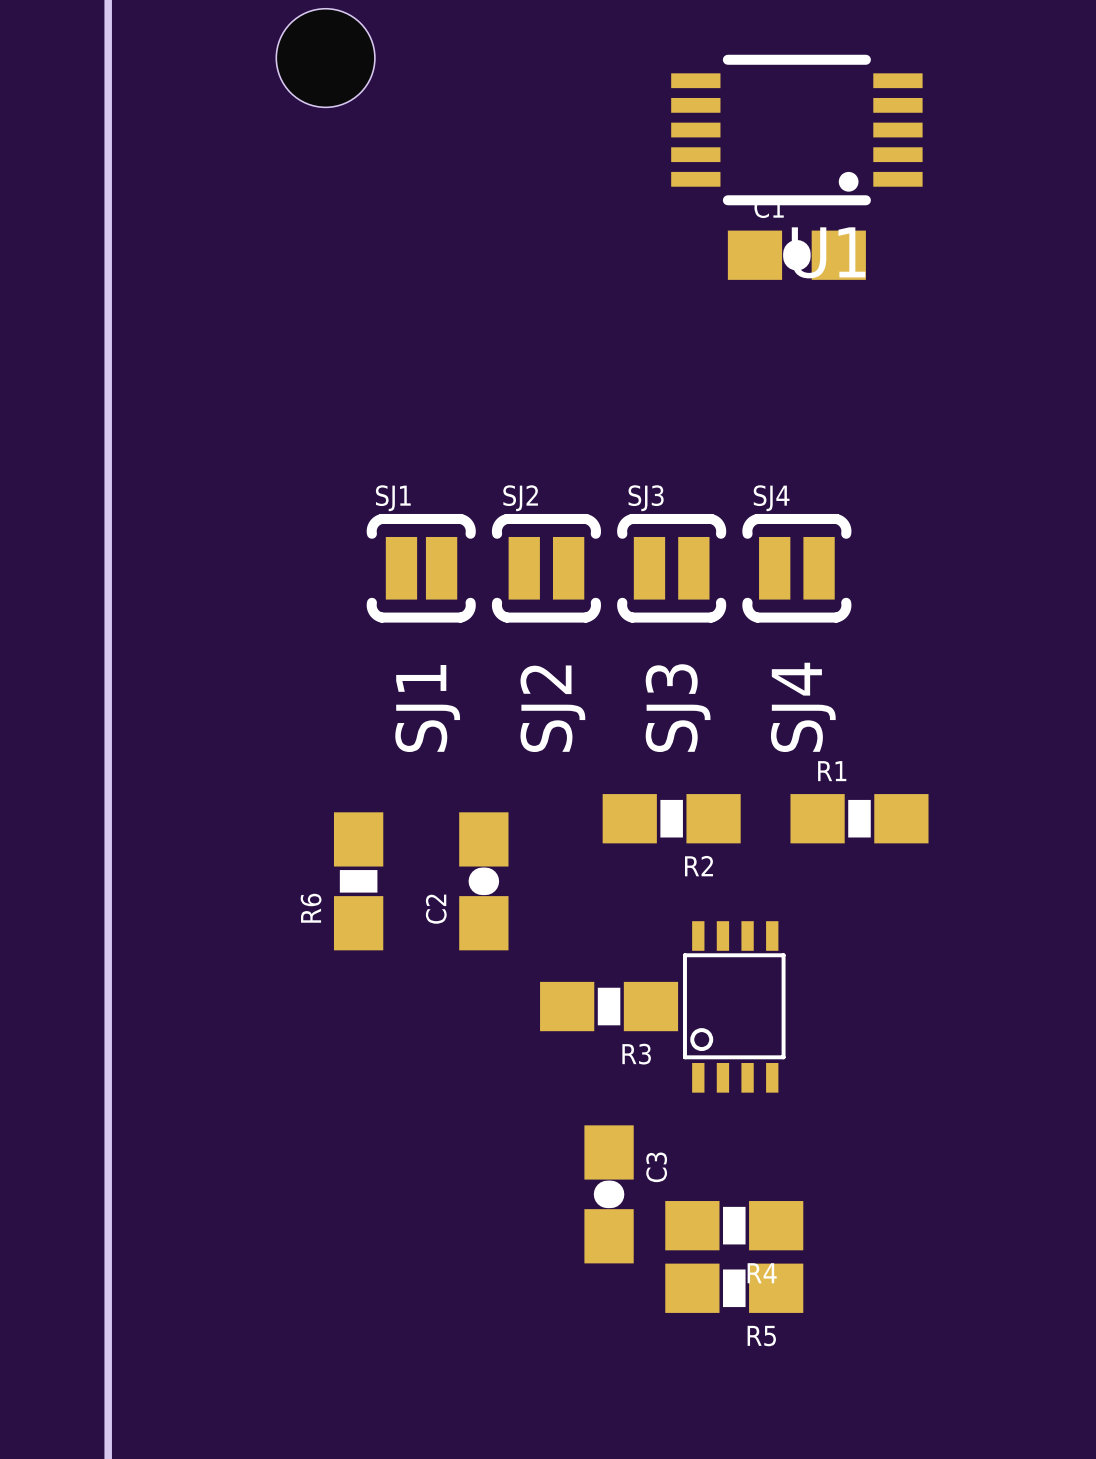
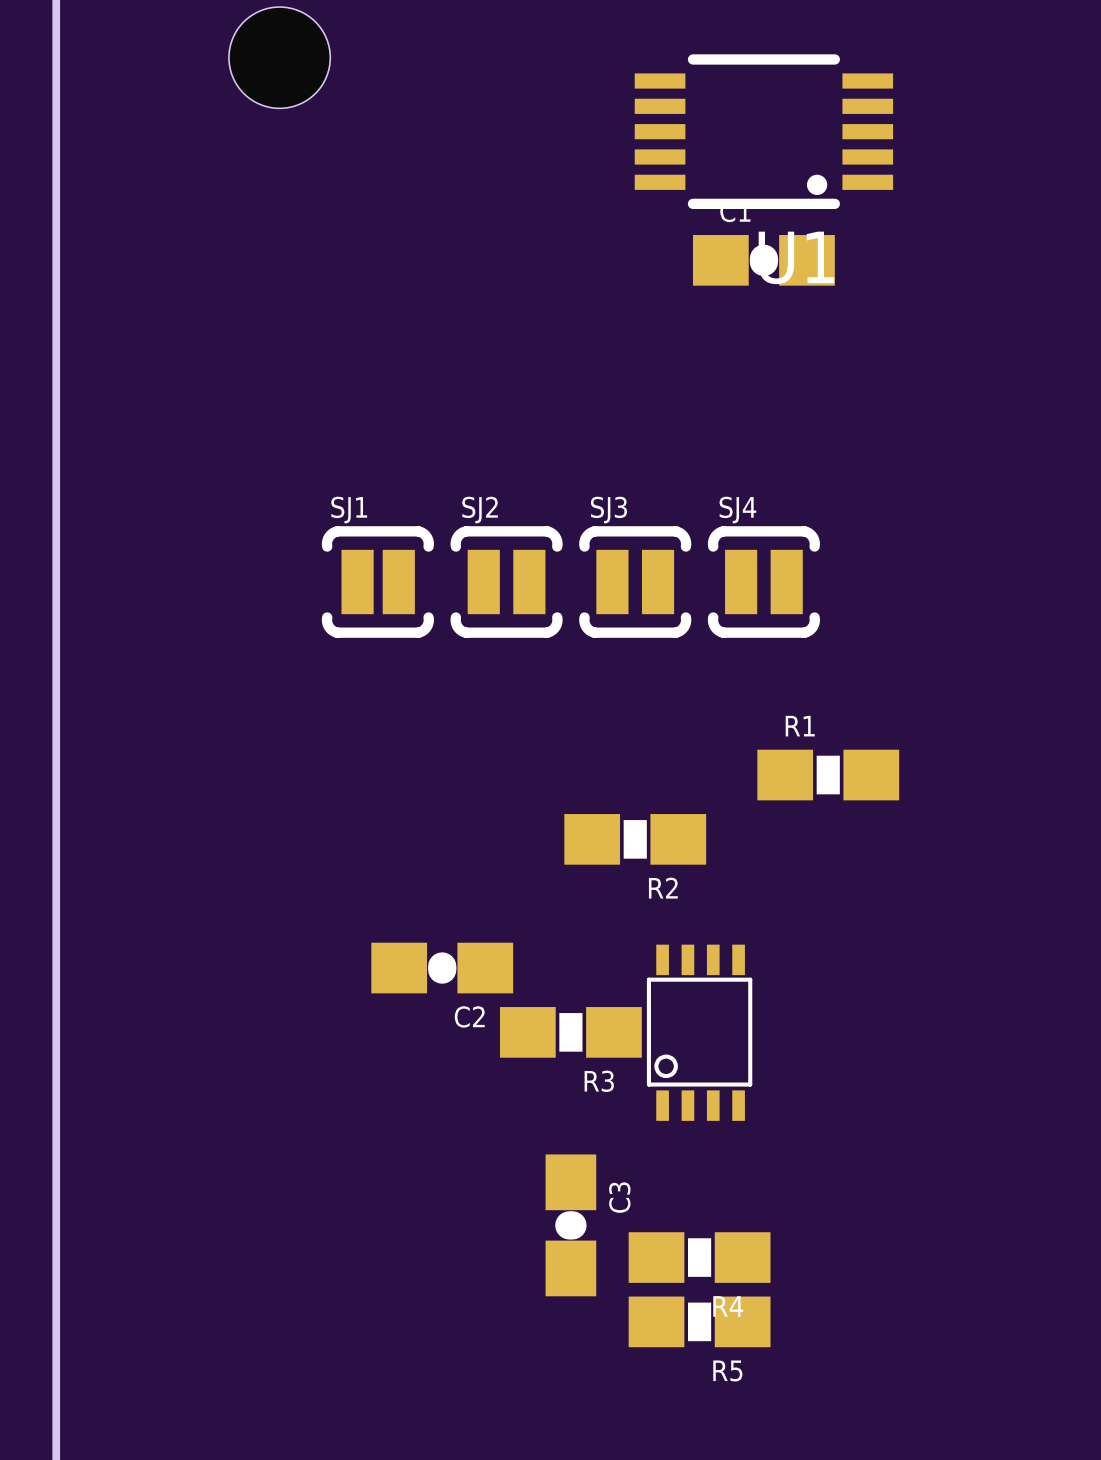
text: SJ4 (803, 707) -> none
text: SJ1 (427, 708) -> none
text: SJ2 (552, 708) -> none
text: SJ3 (678, 708) -> none
R1 position: (859, 818) -> (828, 775)
R6: (358, 881) -> none
C2 rotation: 0° (483, 881) -> 90° clockwise (442, 968)

